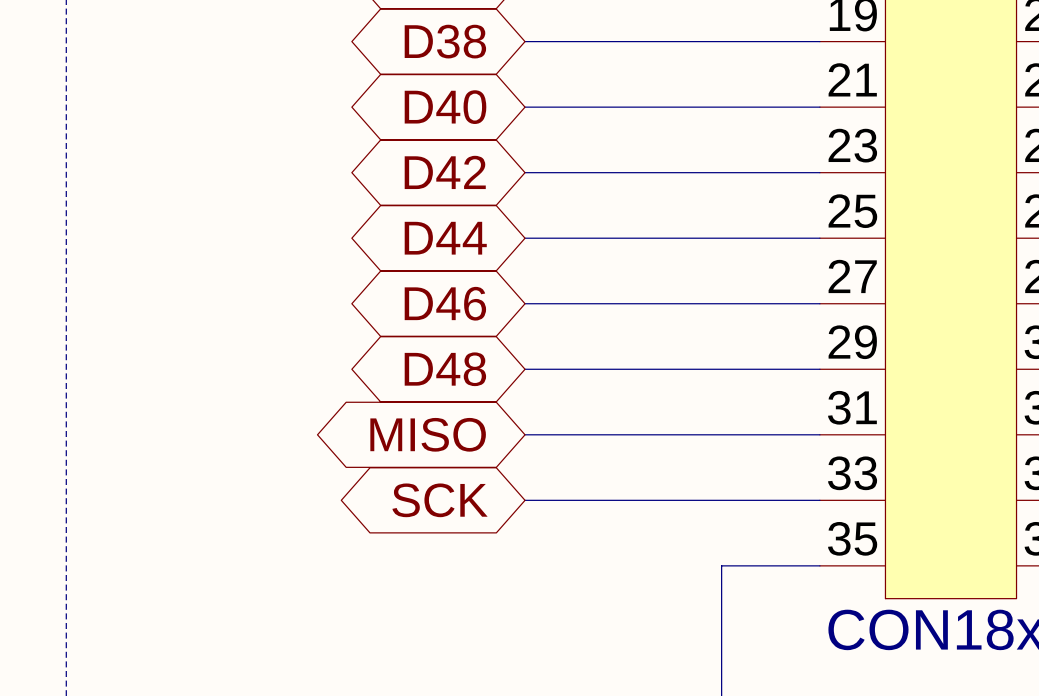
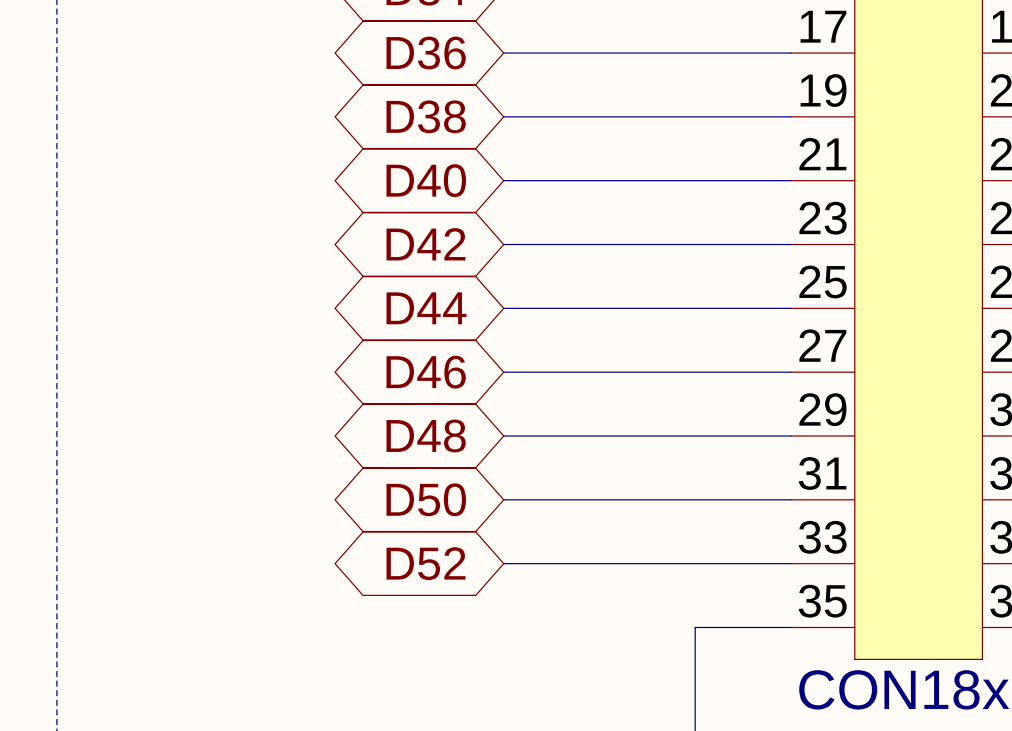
global label: MISO (428, 434) -> D50 (426, 499)
global label: SCK (440, 500) -> D52 (426, 563)

